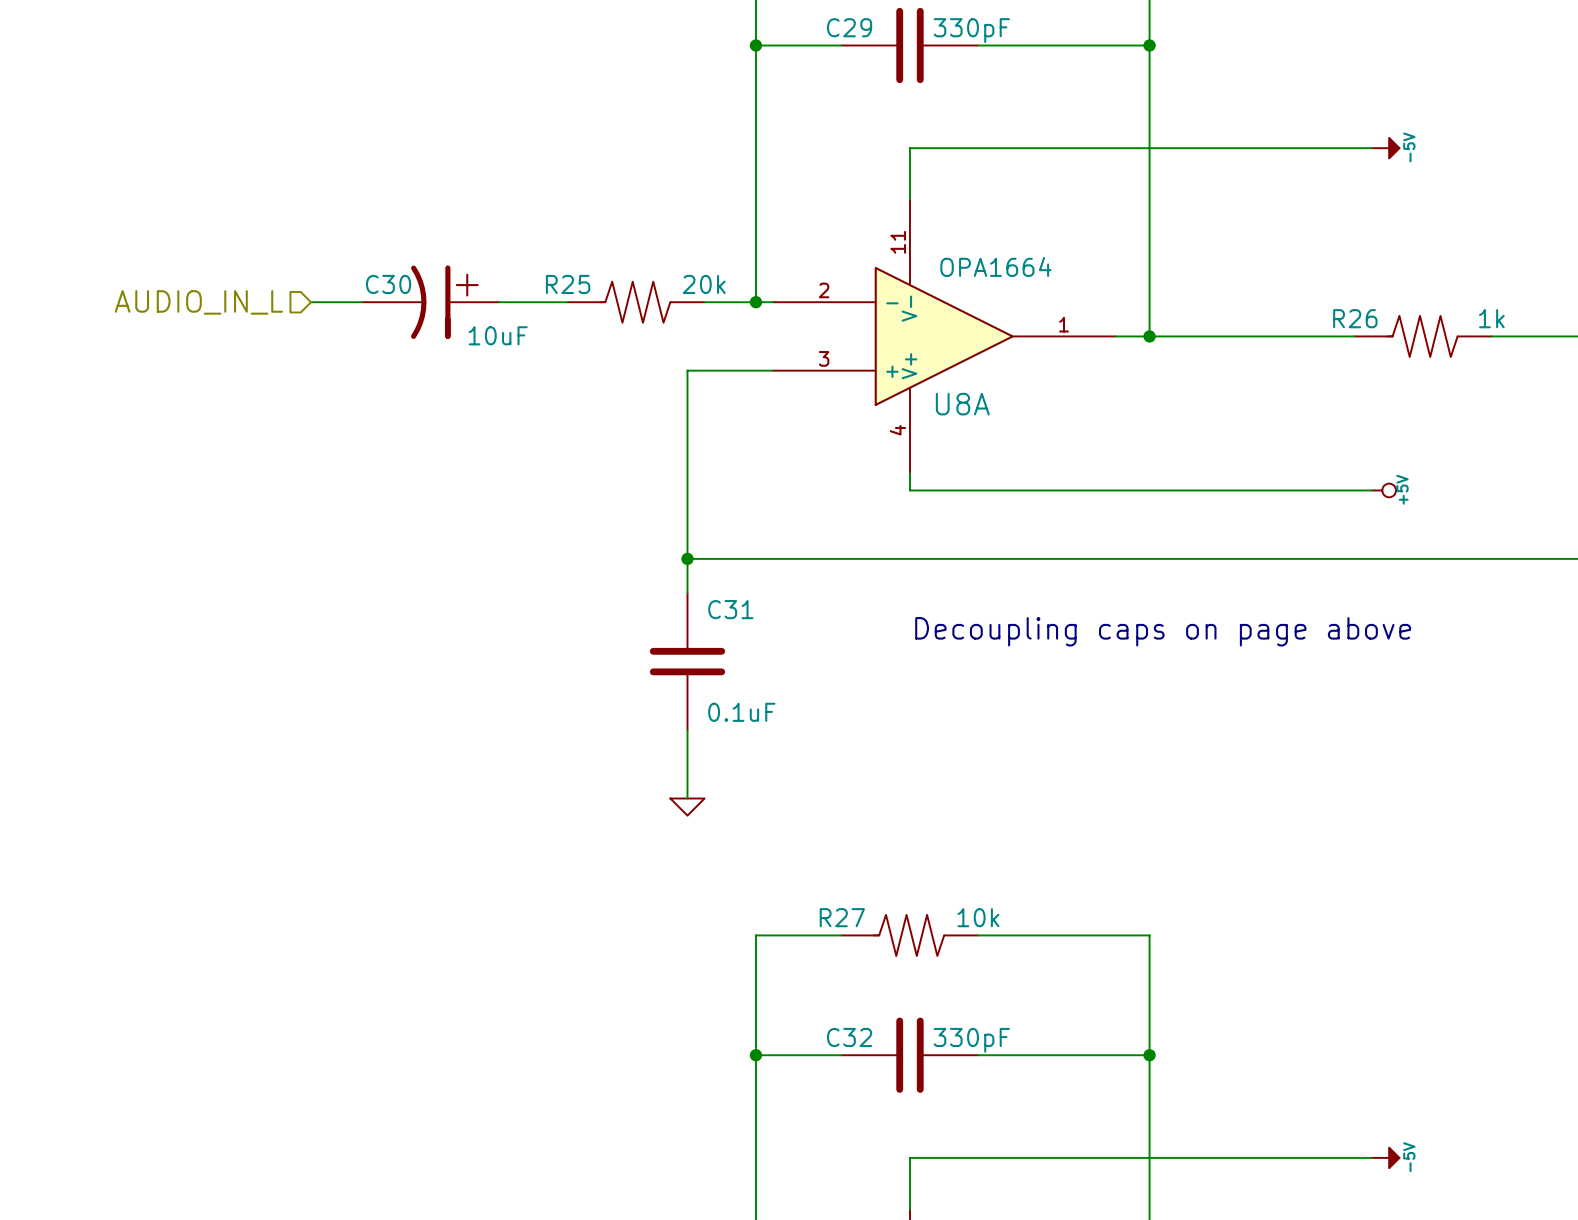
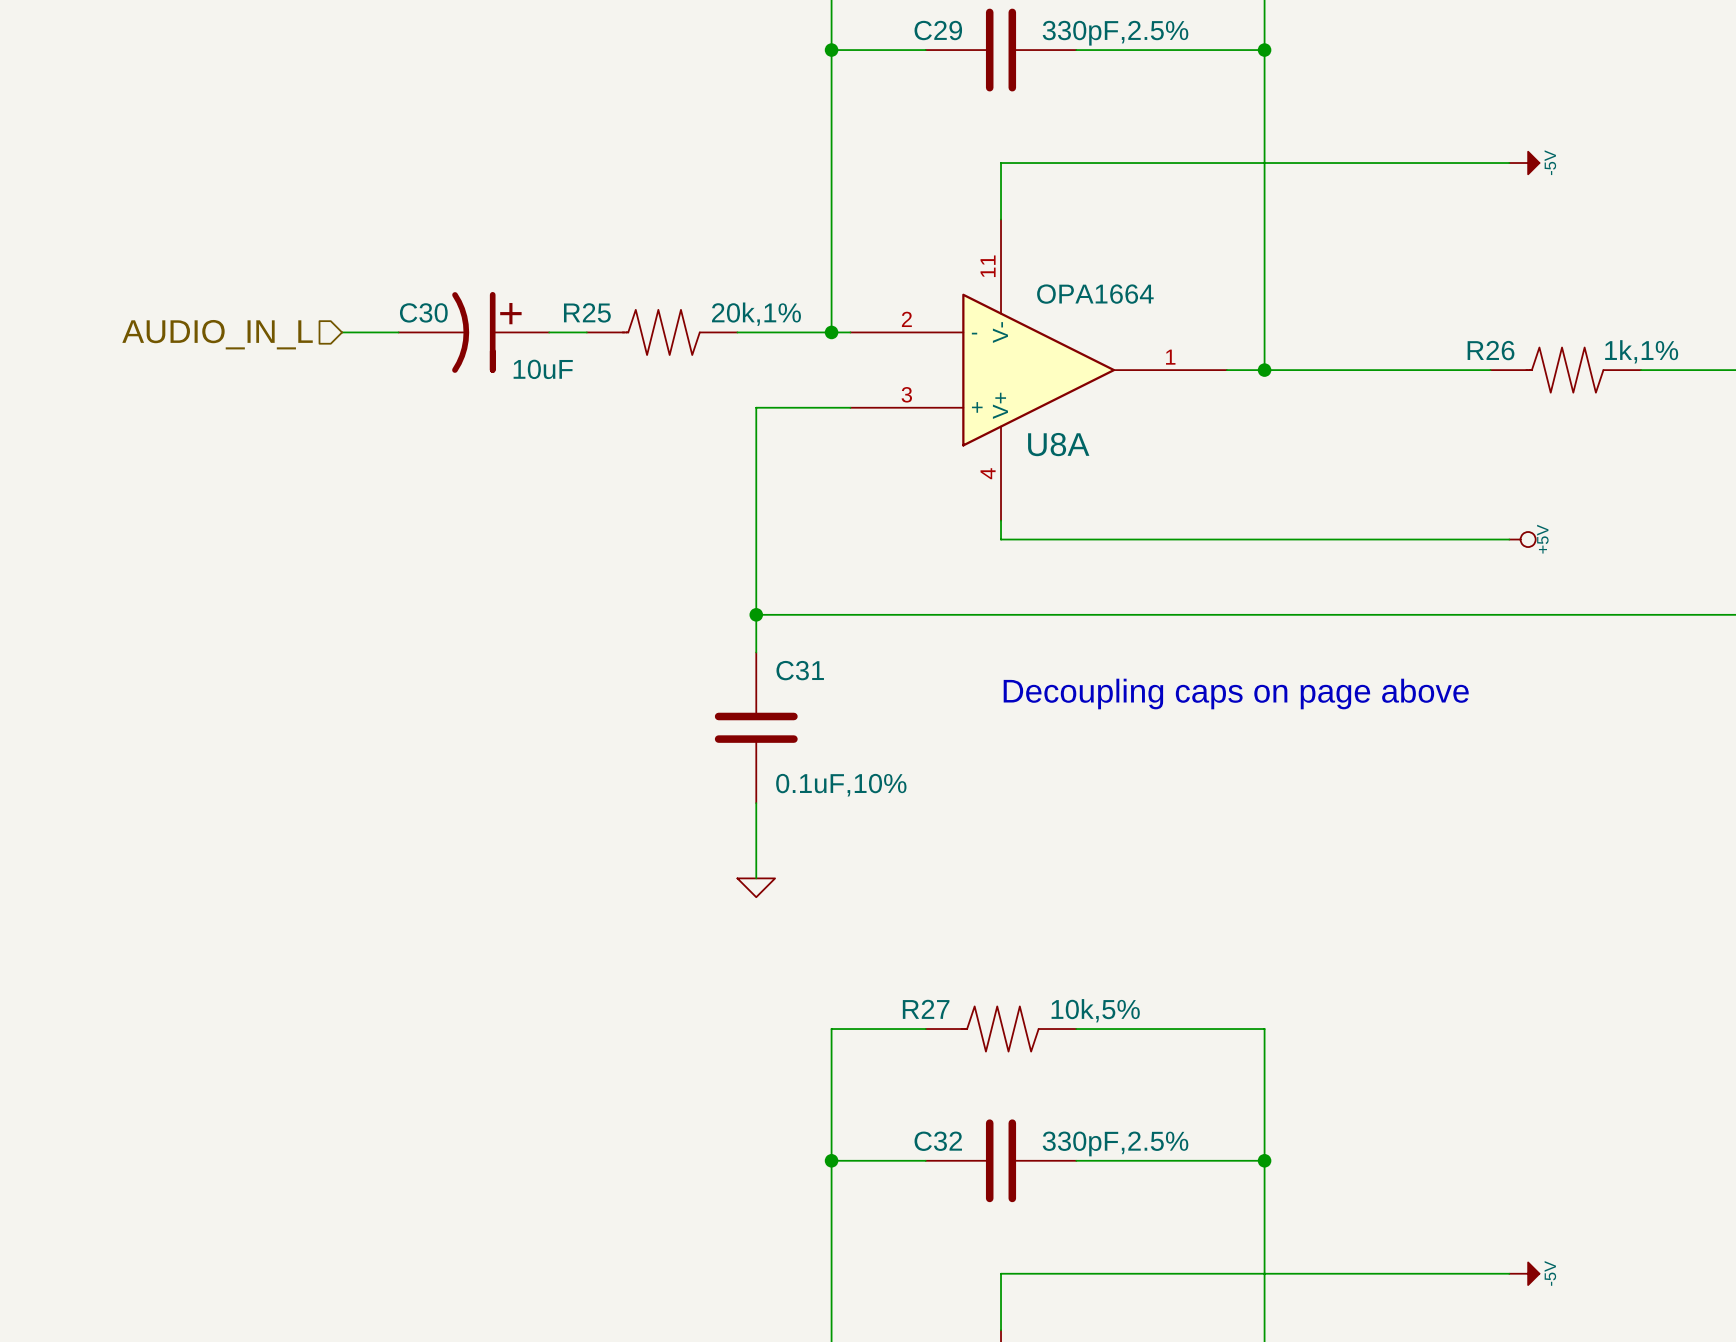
C29 value: 330pF (971, 30) -> 330pF,2.5% (1115, 33)
R25 value: 20k (704, 284) -> 20k,1% (756, 314)
R25 position: (636, 302) -> (662, 332)
R26 value: 1k (1491, 318) -> 1k,1% (1641, 351)
C31 value: 0.1uF (741, 712) -> 0.1uF,10% (841, 785)
R27 value: 10k (978, 917) -> 10k,5% (1095, 1010)
C32 value: 330pF (971, 1040) -> 330pF,2.5% (1115, 1143)

